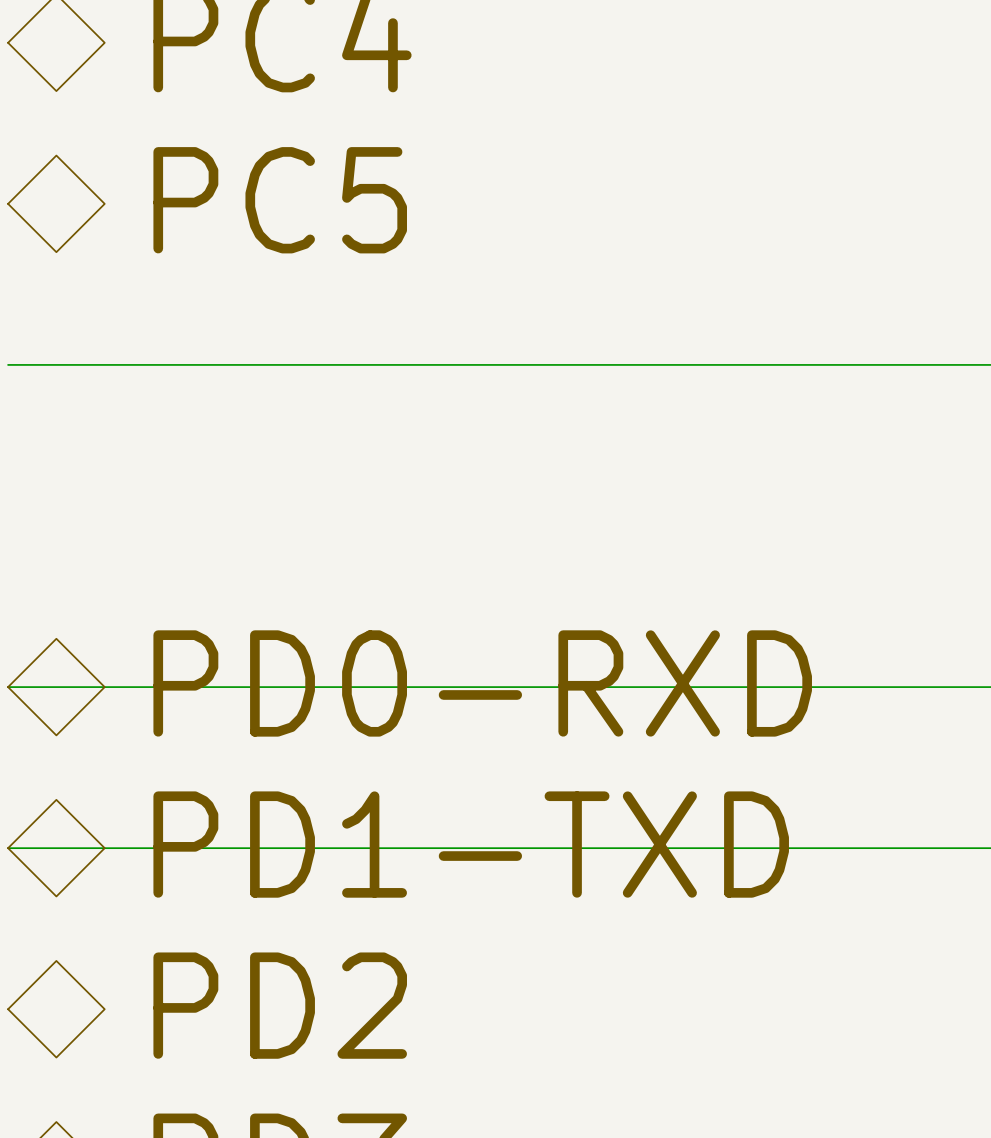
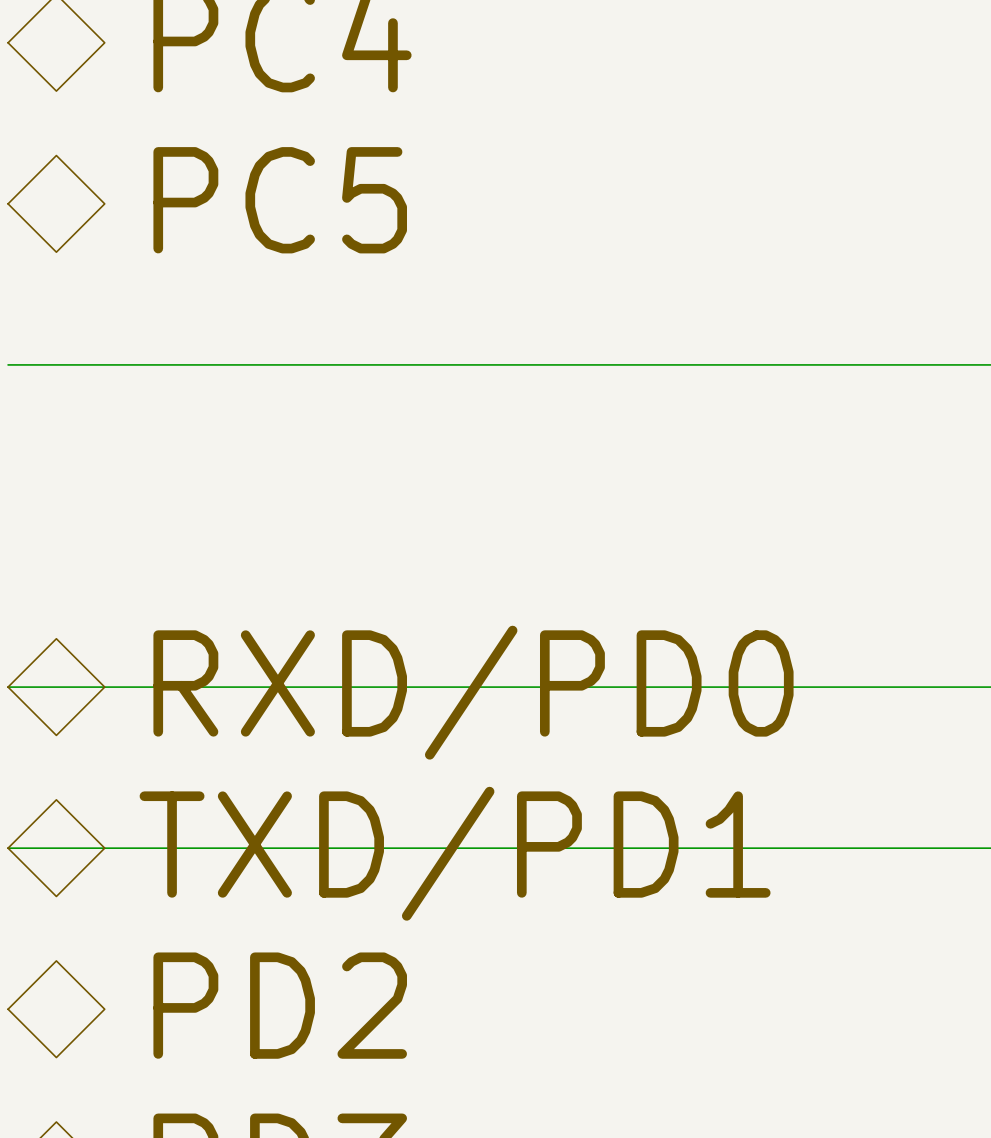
hierarchical label: PD0-RXD (482, 683) -> RXD/PD0 (473, 692)
hierarchical label: PD1-TXD (471, 844) -> TXD/PD1 (455, 853)

